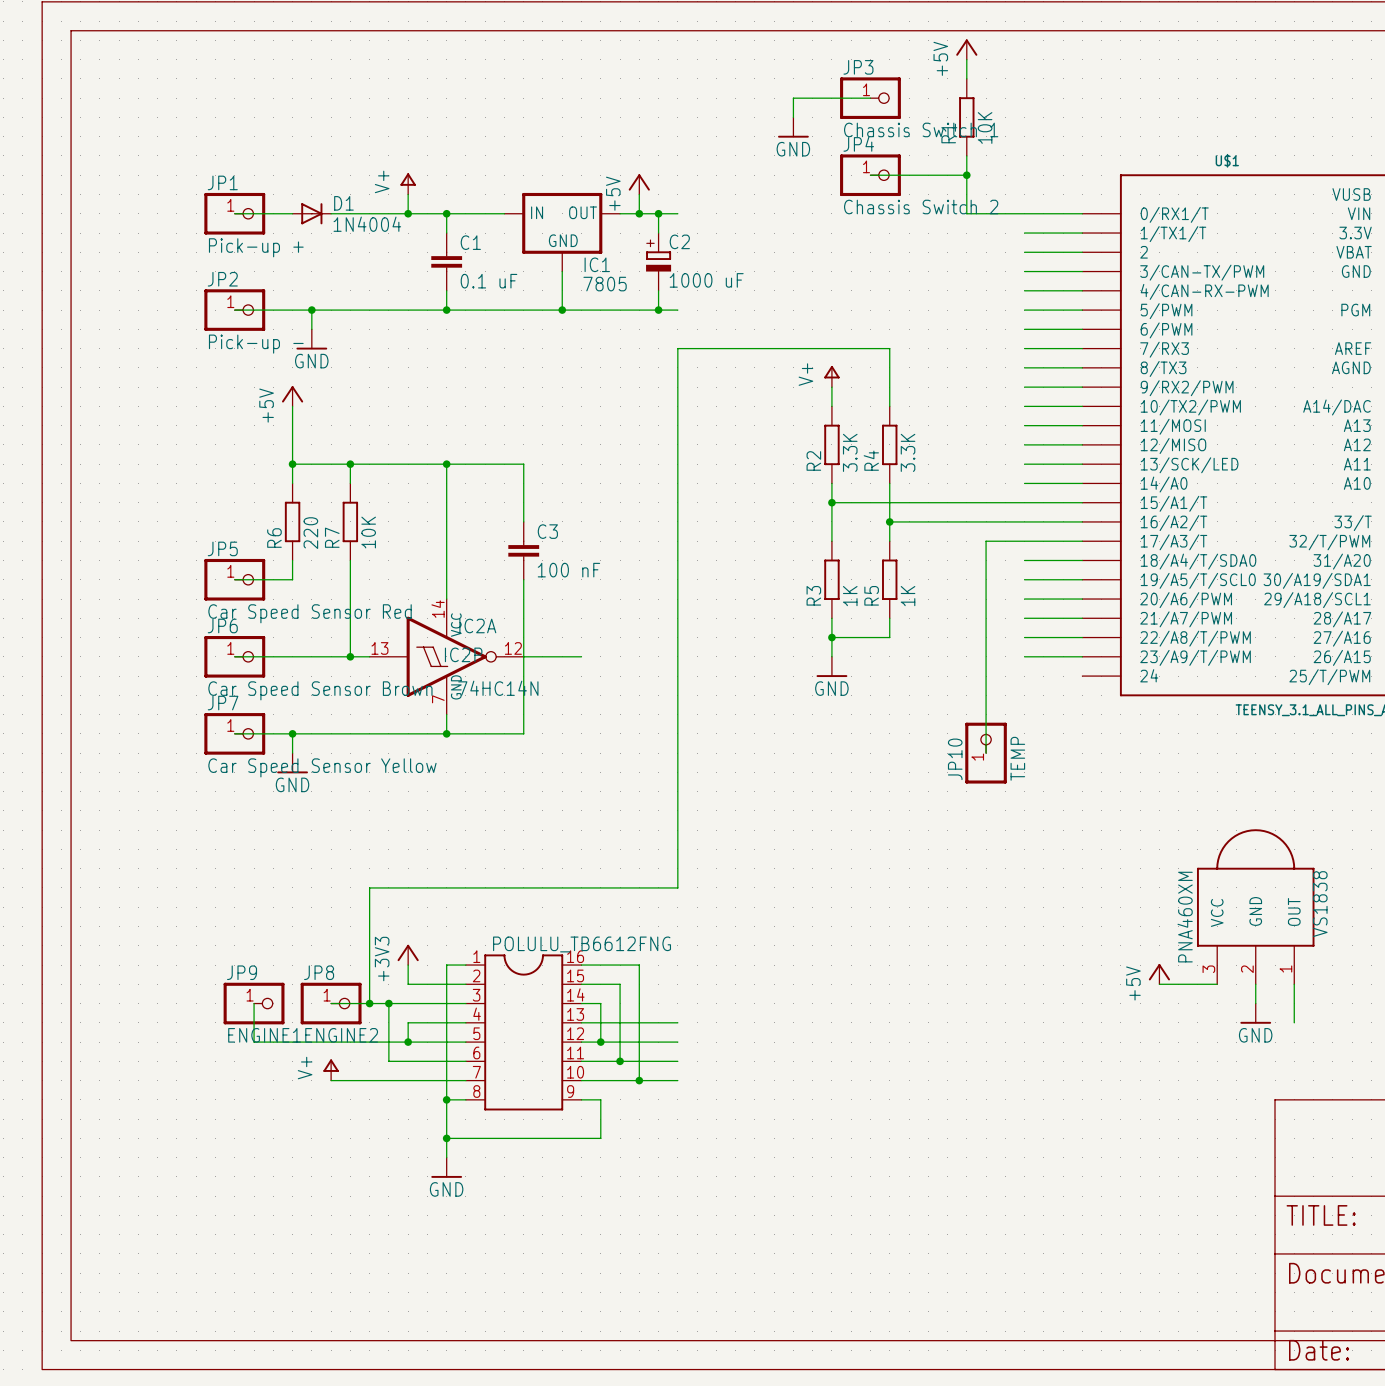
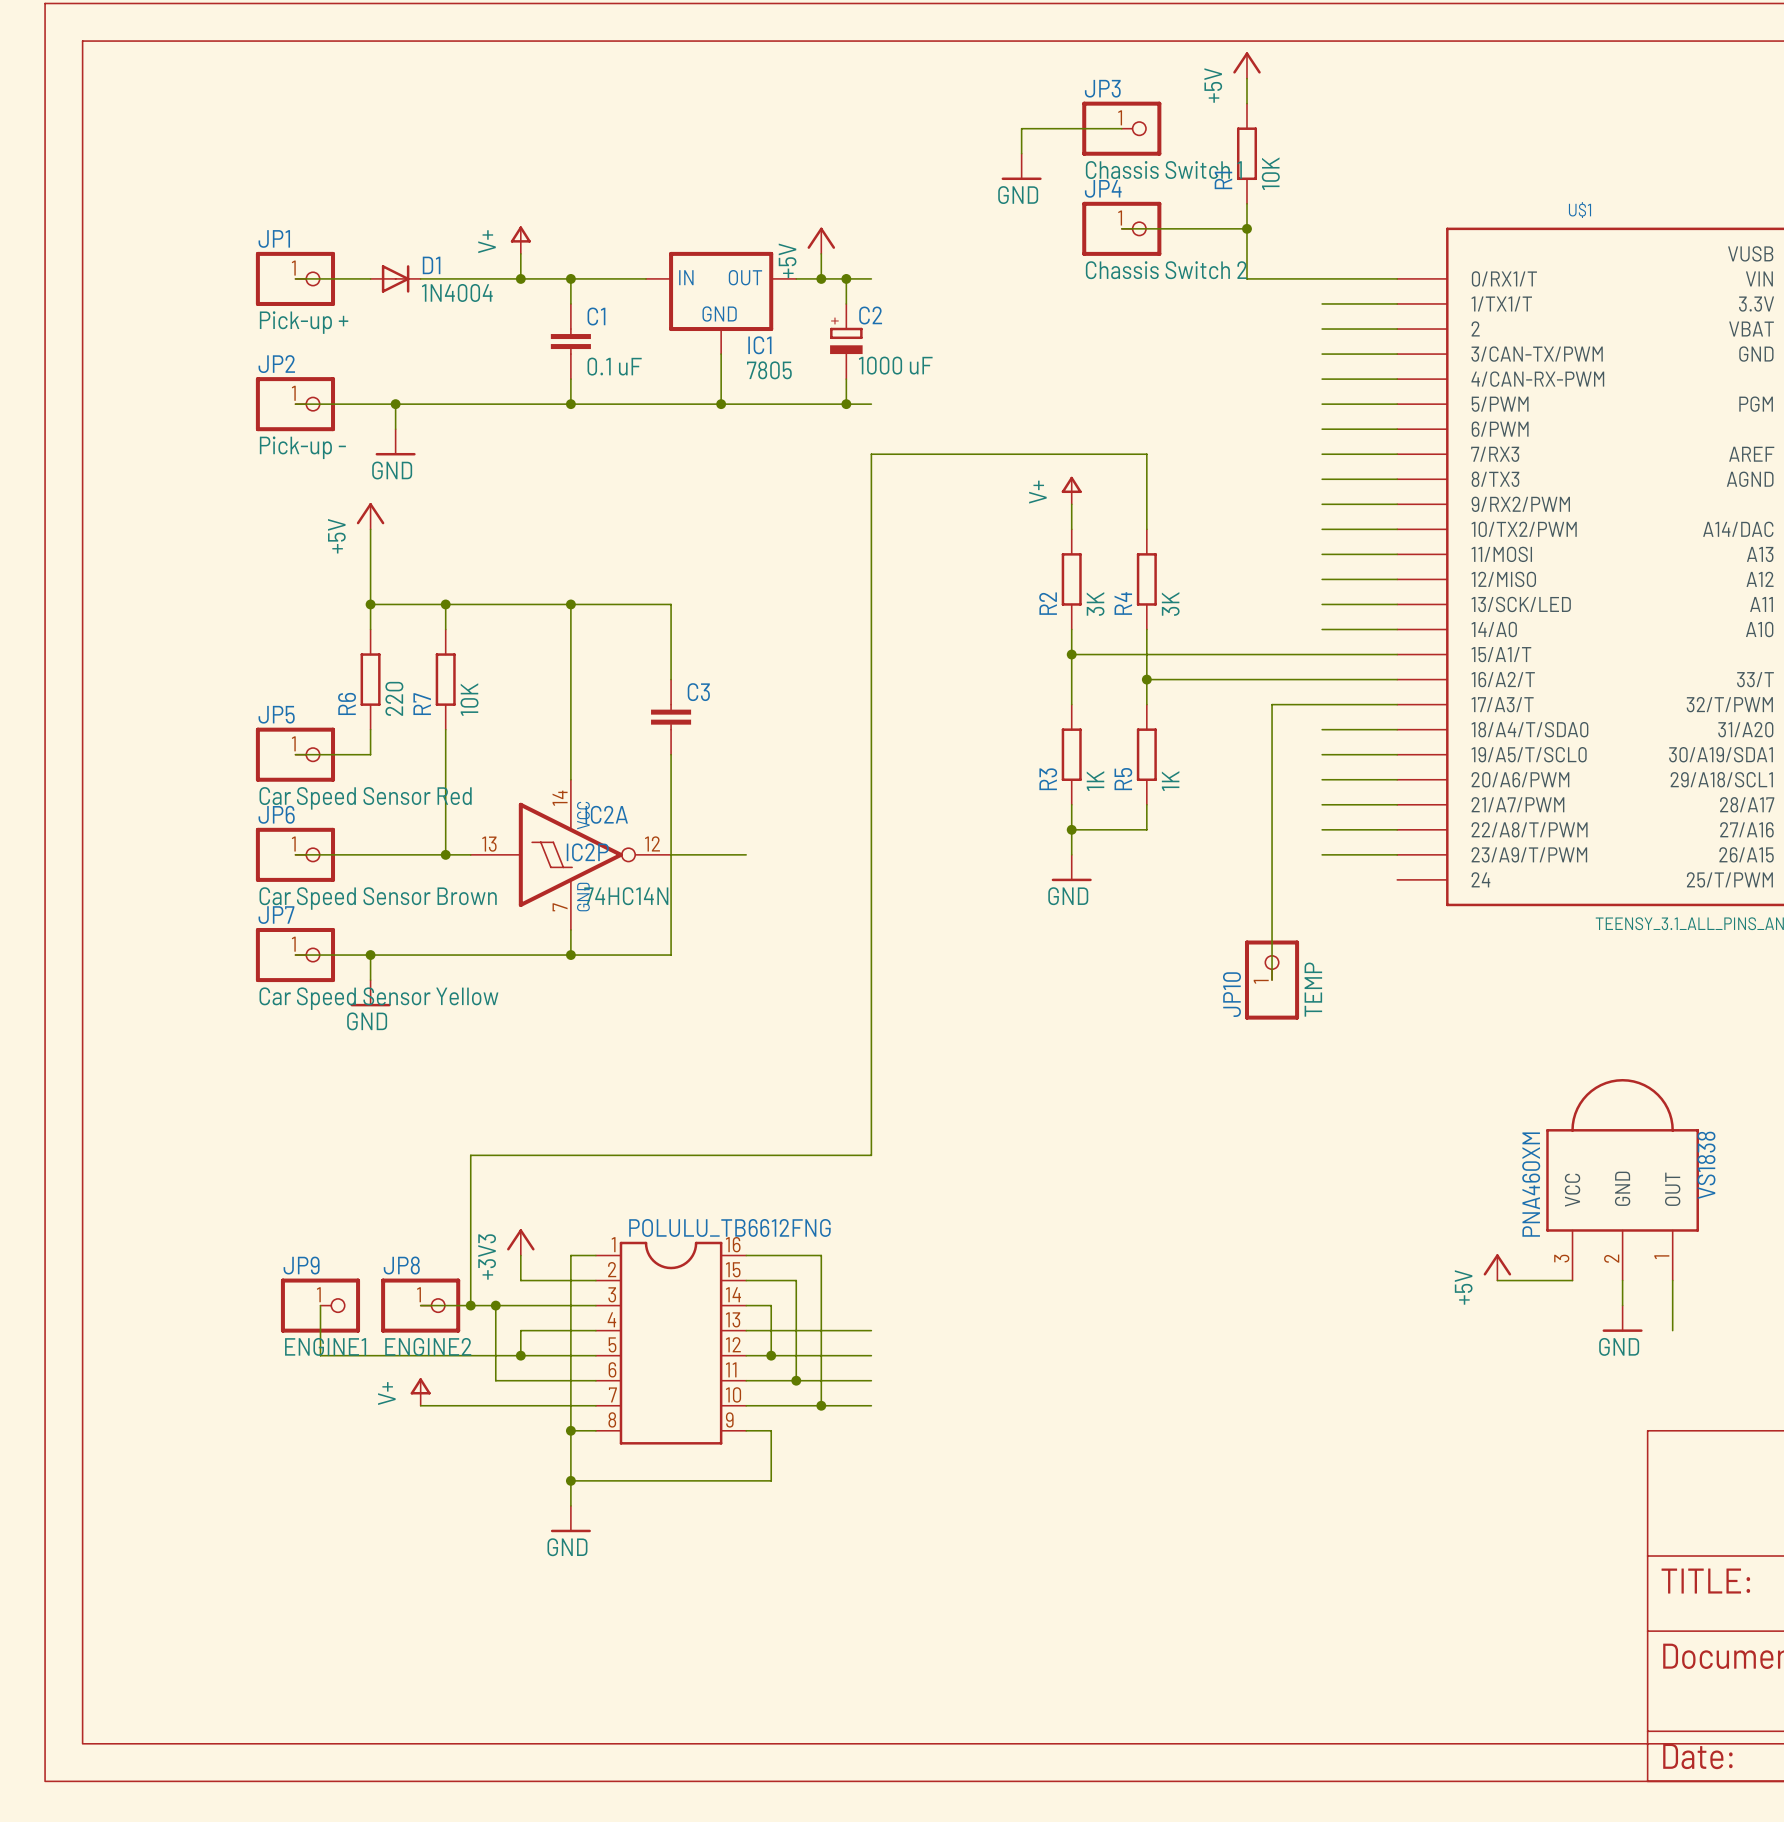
R2 value: 3.3K (850, 452) -> 3K (1095, 604)
R4 value: 3.3K (908, 452) -> 3K (1170, 604)
C3 value: 100 nF (568, 570) -> none

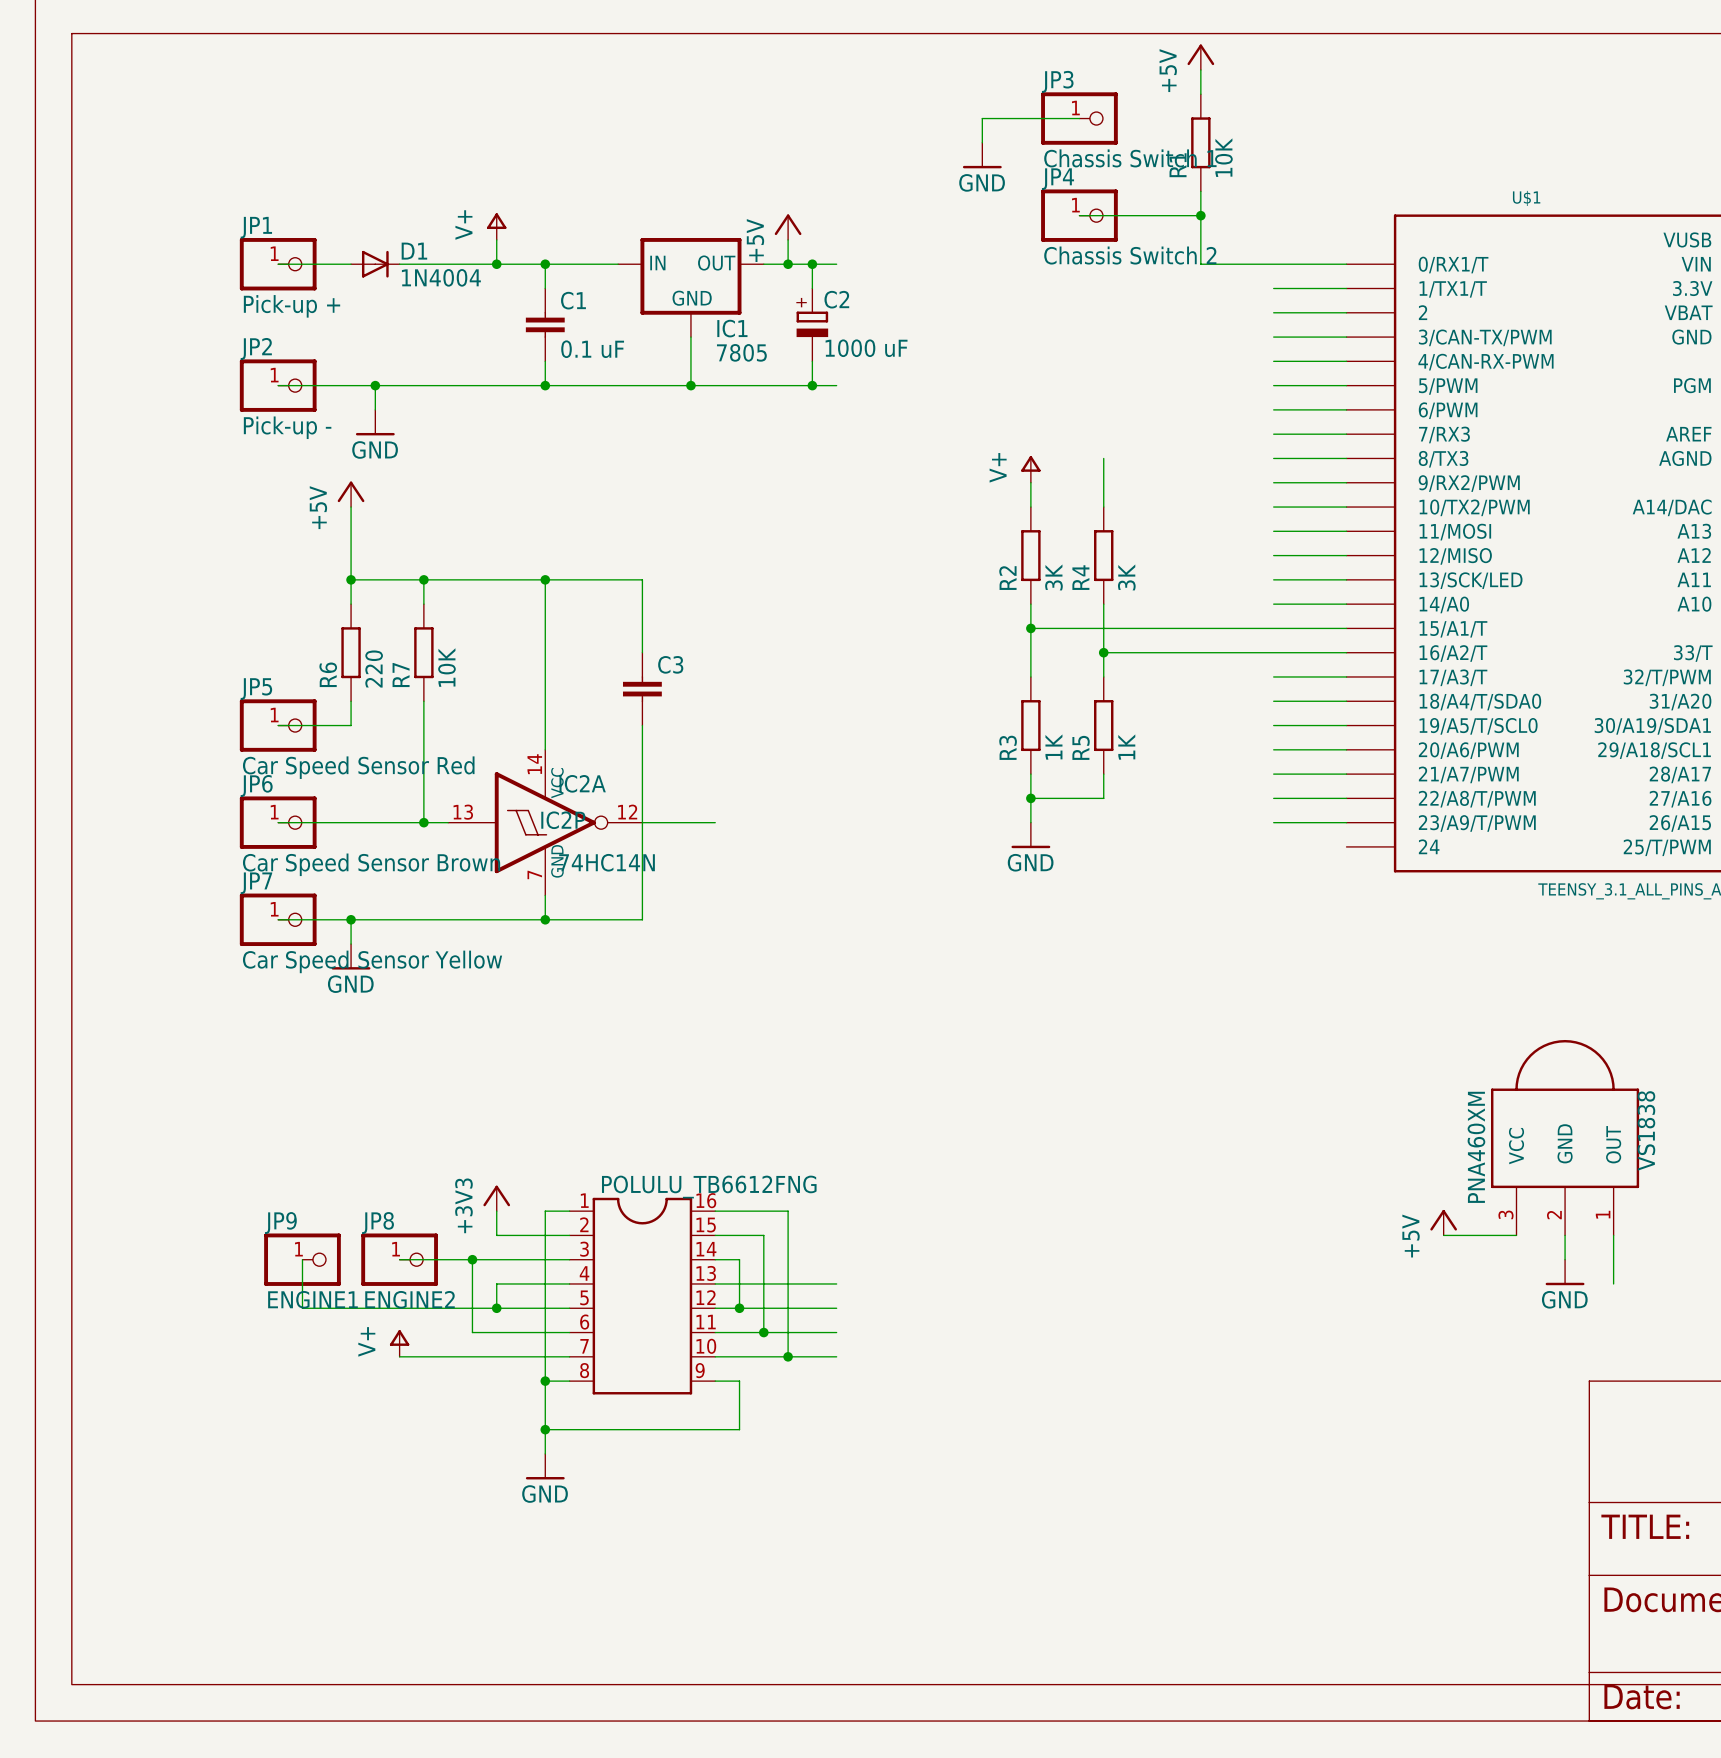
wire: (1146, 479) (1146, 454) (871, 454) (871, 1155) (470, 1155) (470, 1305) -> none
wire: (1322, 704) (1272, 704) (1272, 980) -> none
JP10: TEMP (1272, 980) -> none
junction: (470, 1305) -> none

